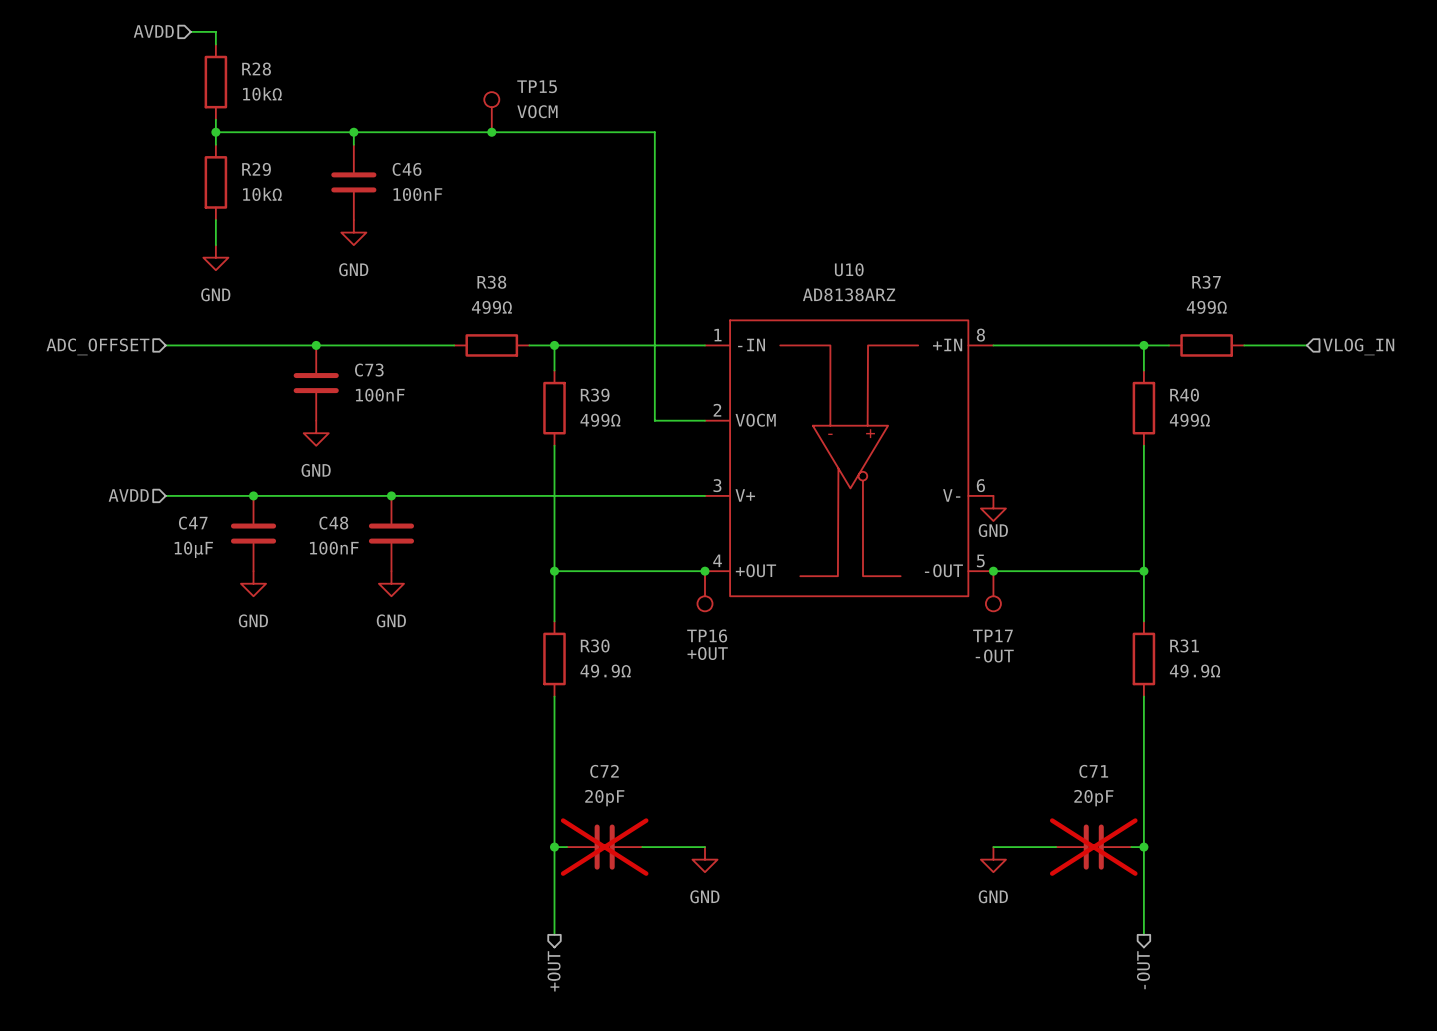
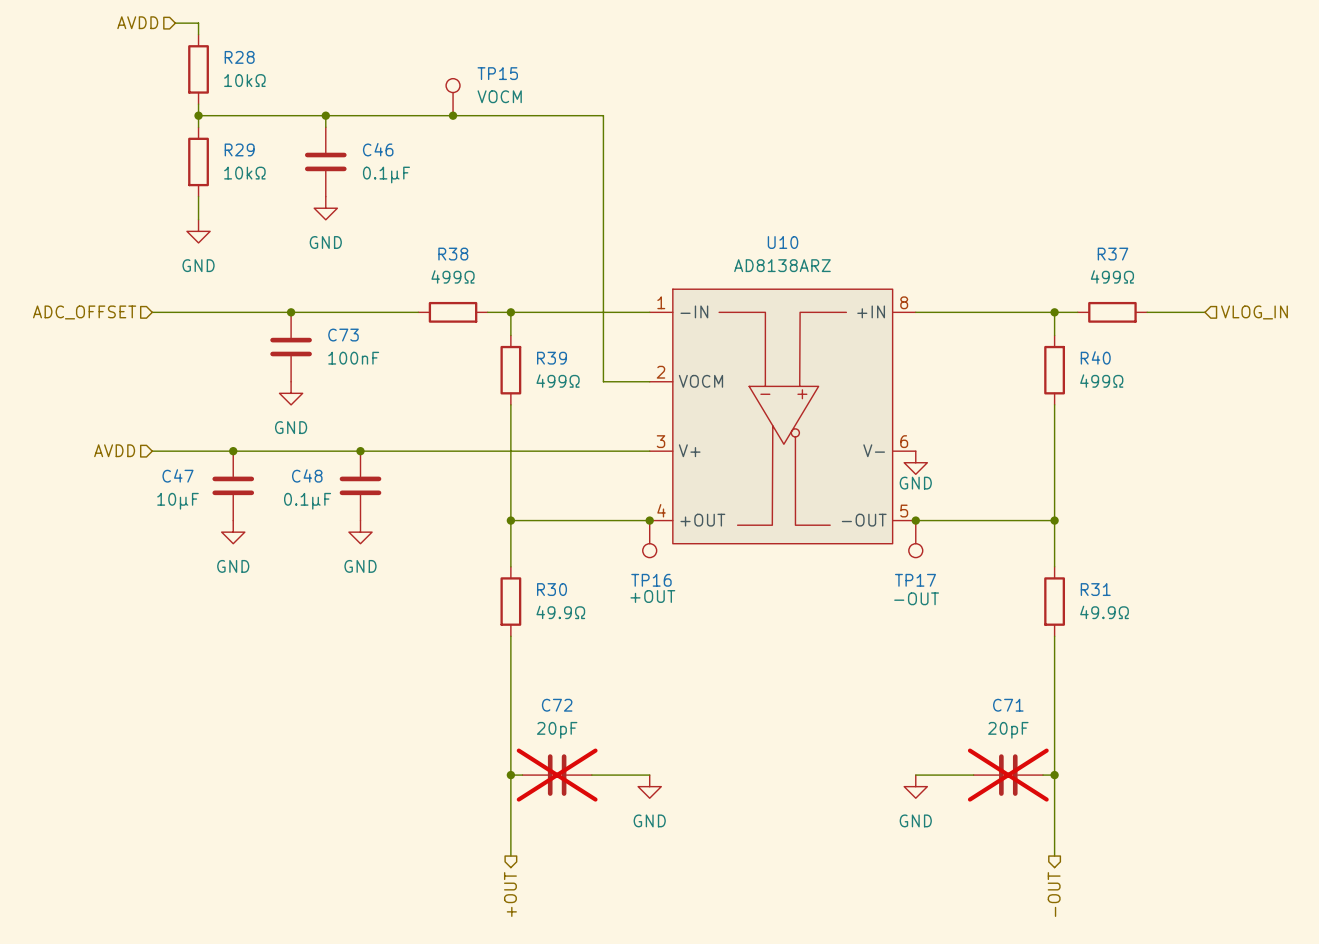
C46 value: 100nF (417, 194) -> 0.1µF (386, 175)
C48 value: 100nF (334, 548) -> 0.1µF (307, 501)

